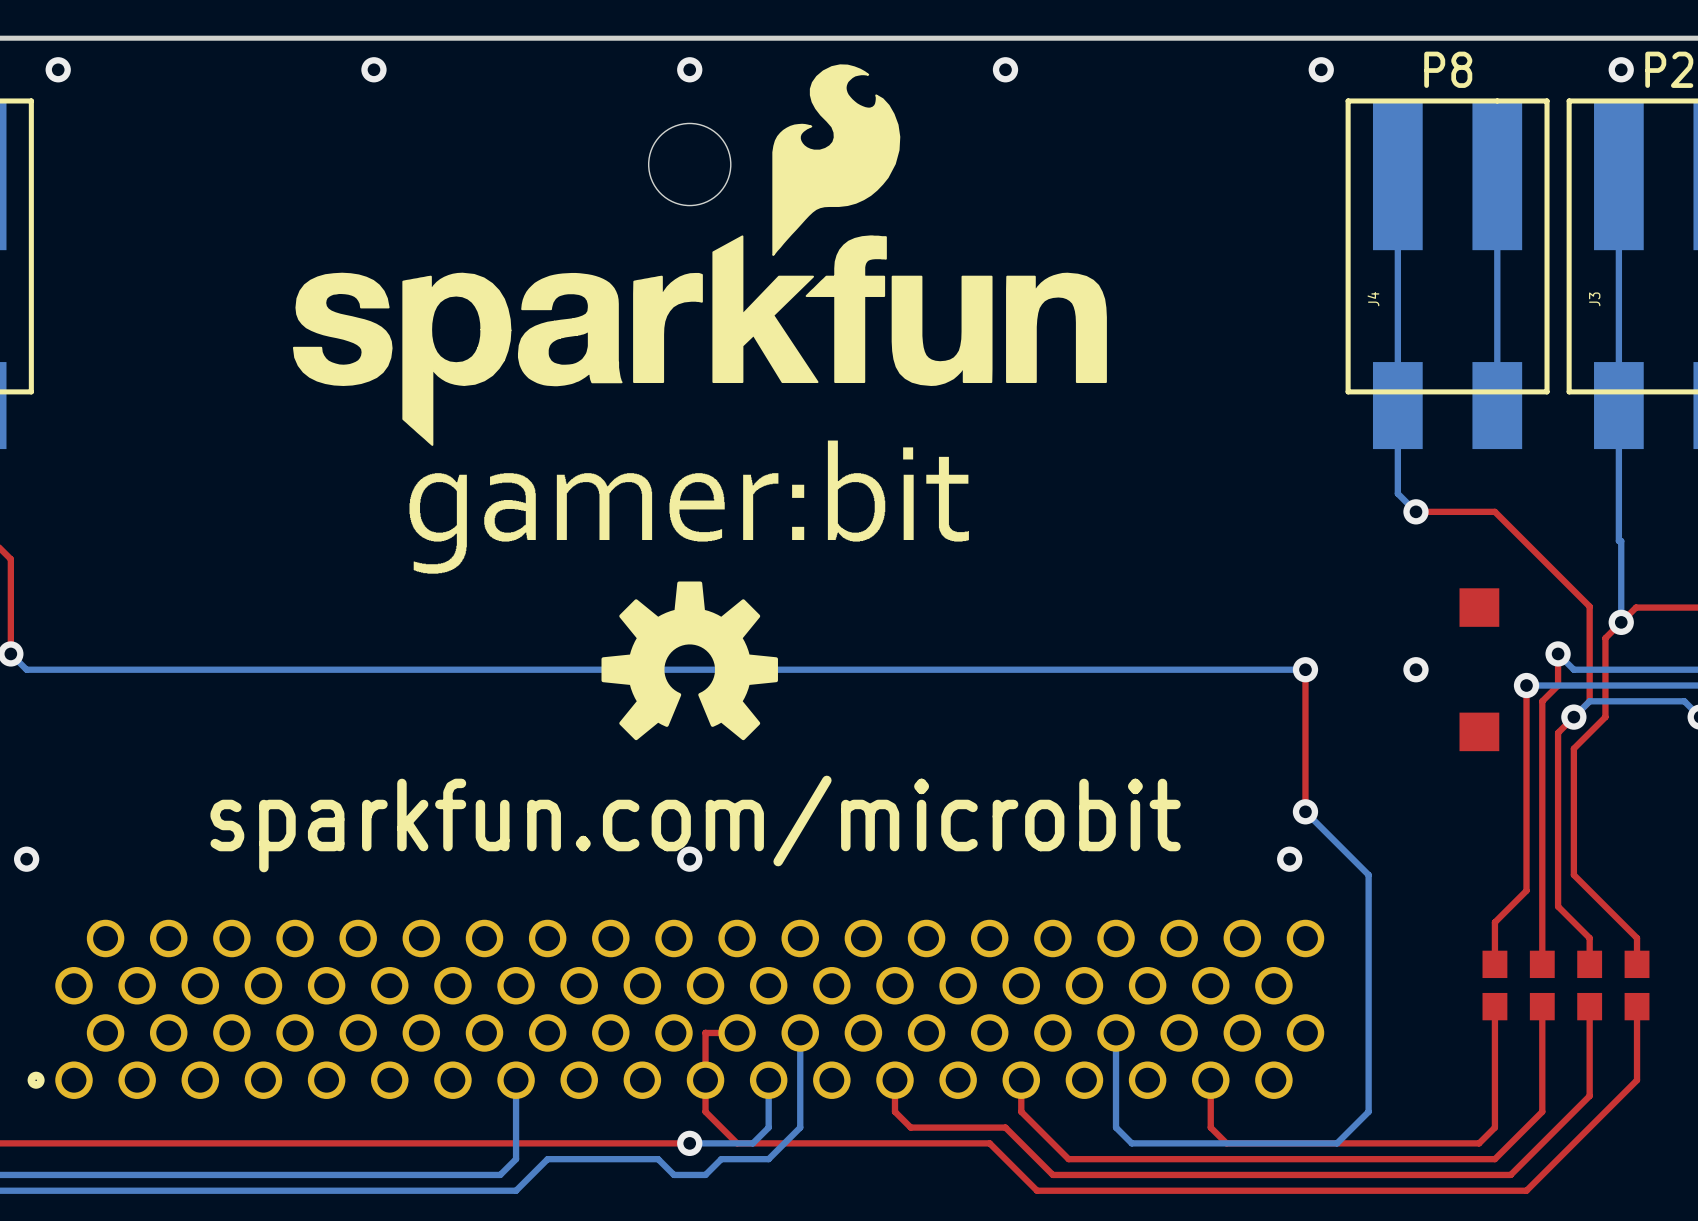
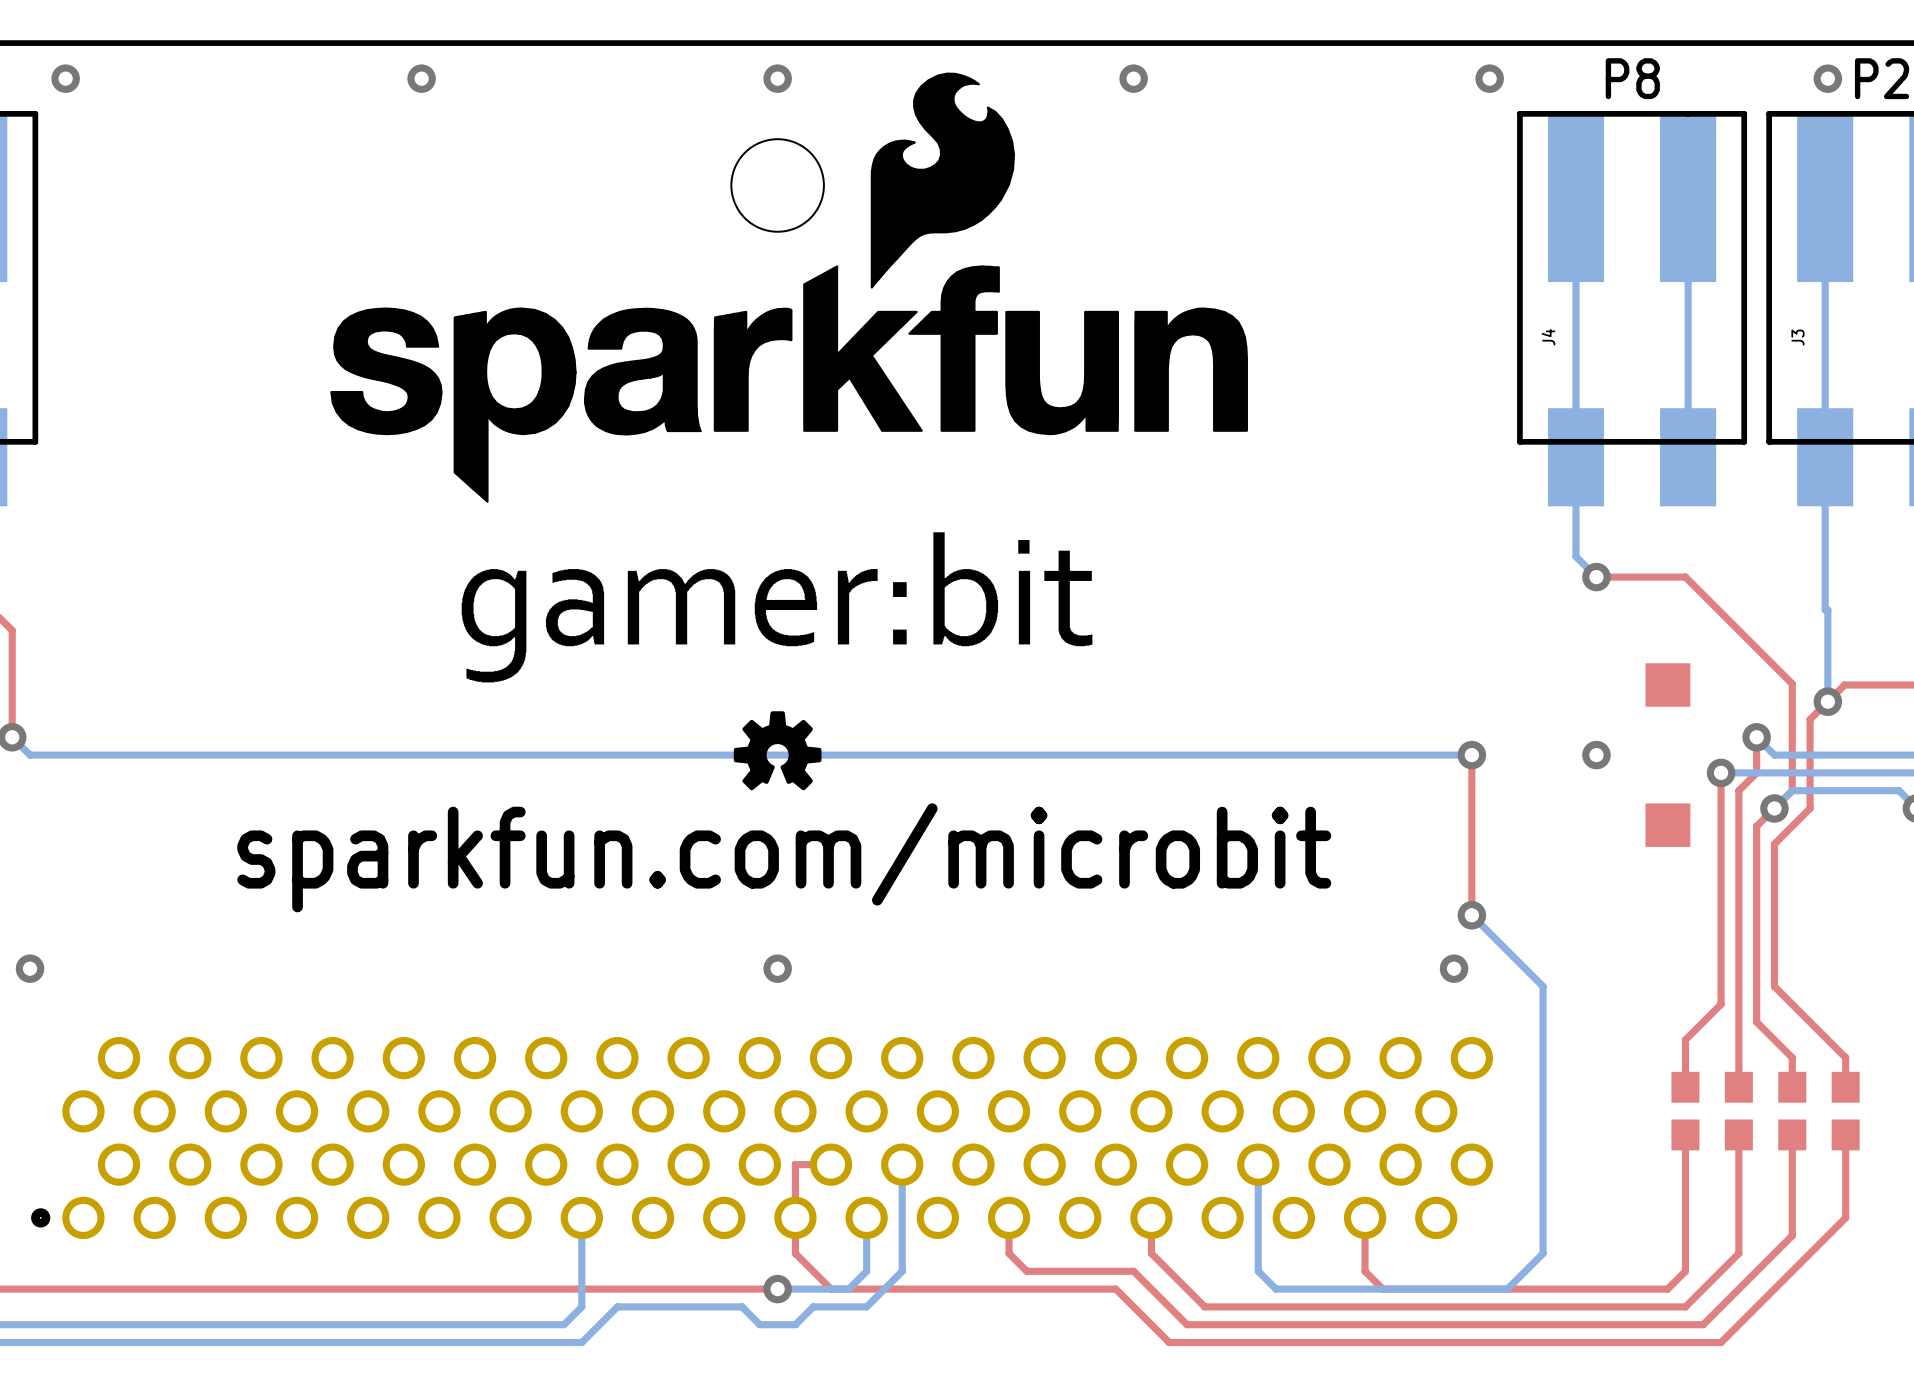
drawing position: (689, 507) -> (777, 607)
drawing shape: [601, 581, 778, 741] -> [733, 711, 822, 791]
text position: sparkfun.com/microbit (695, 824) -> sparkfun.com/microbit (784, 857)

